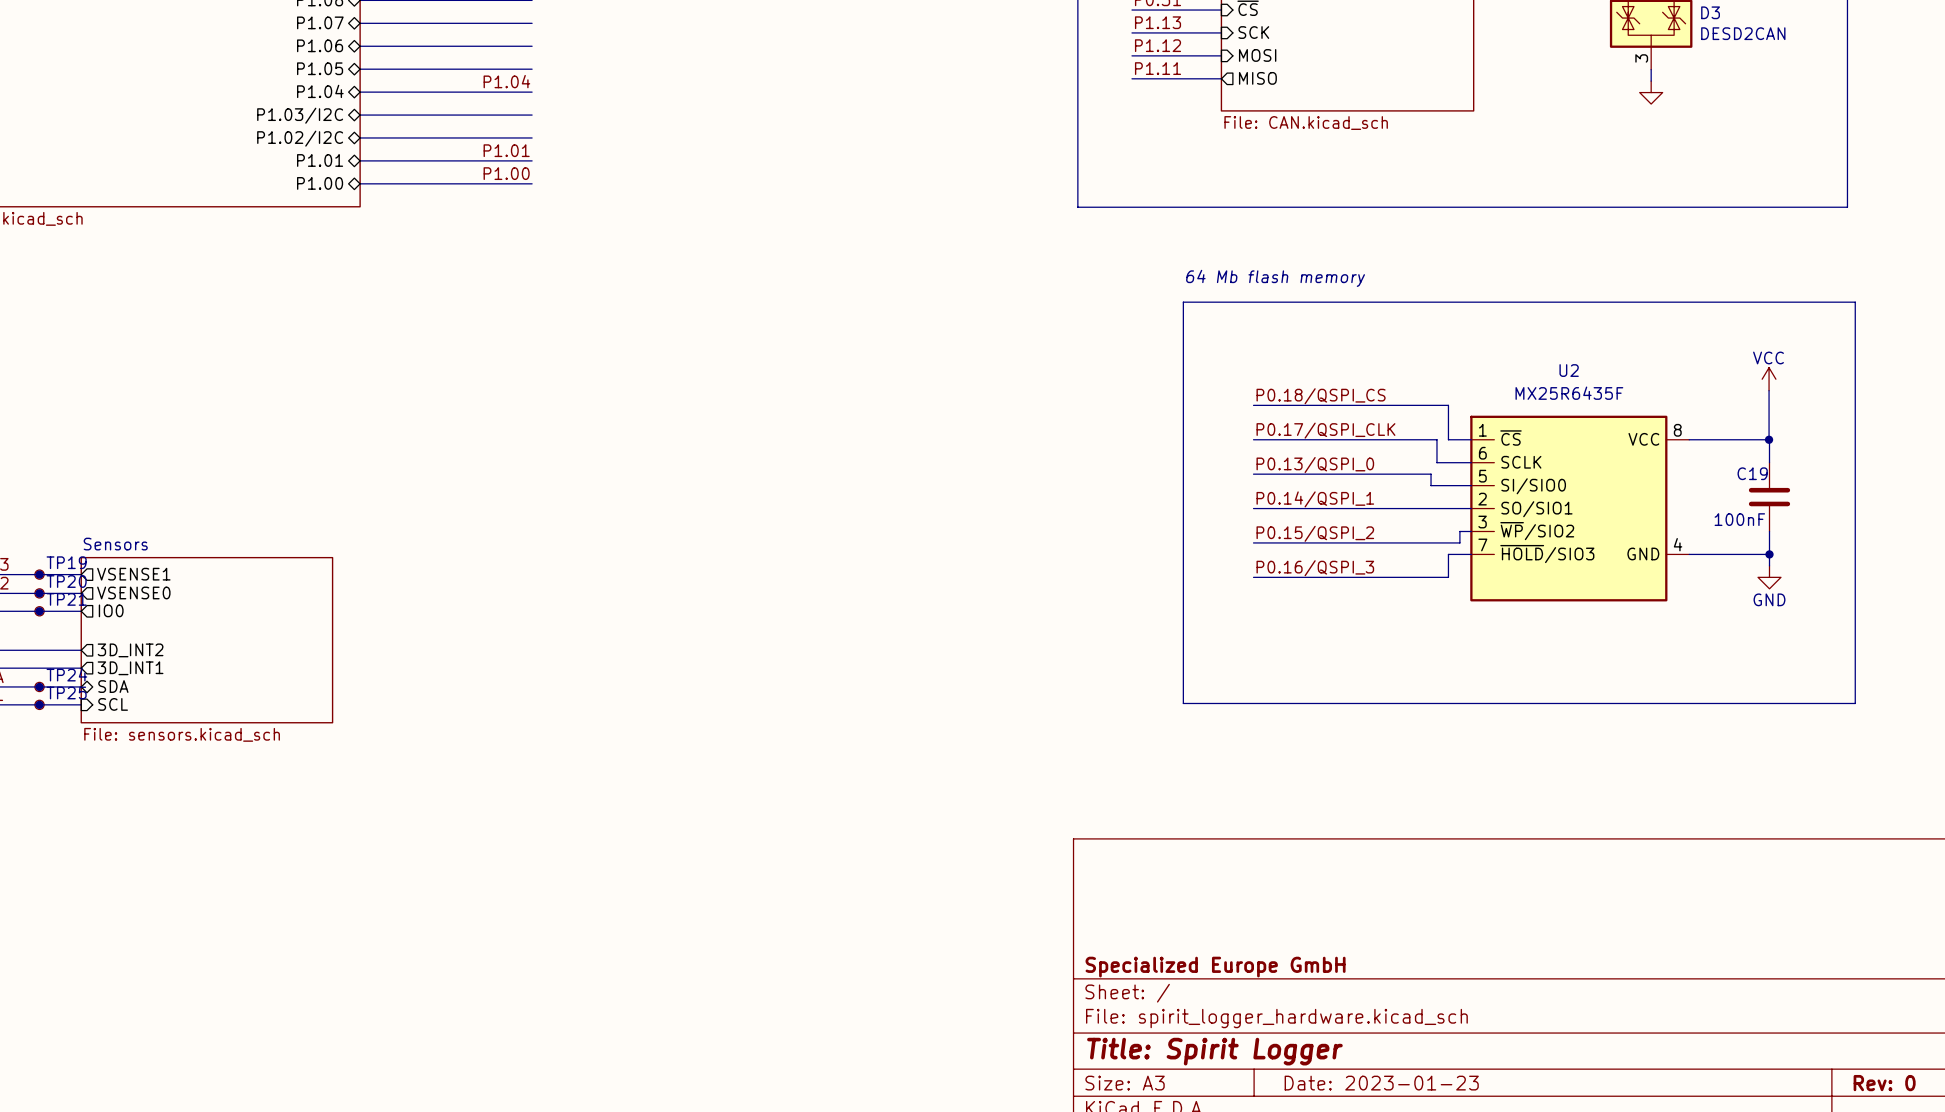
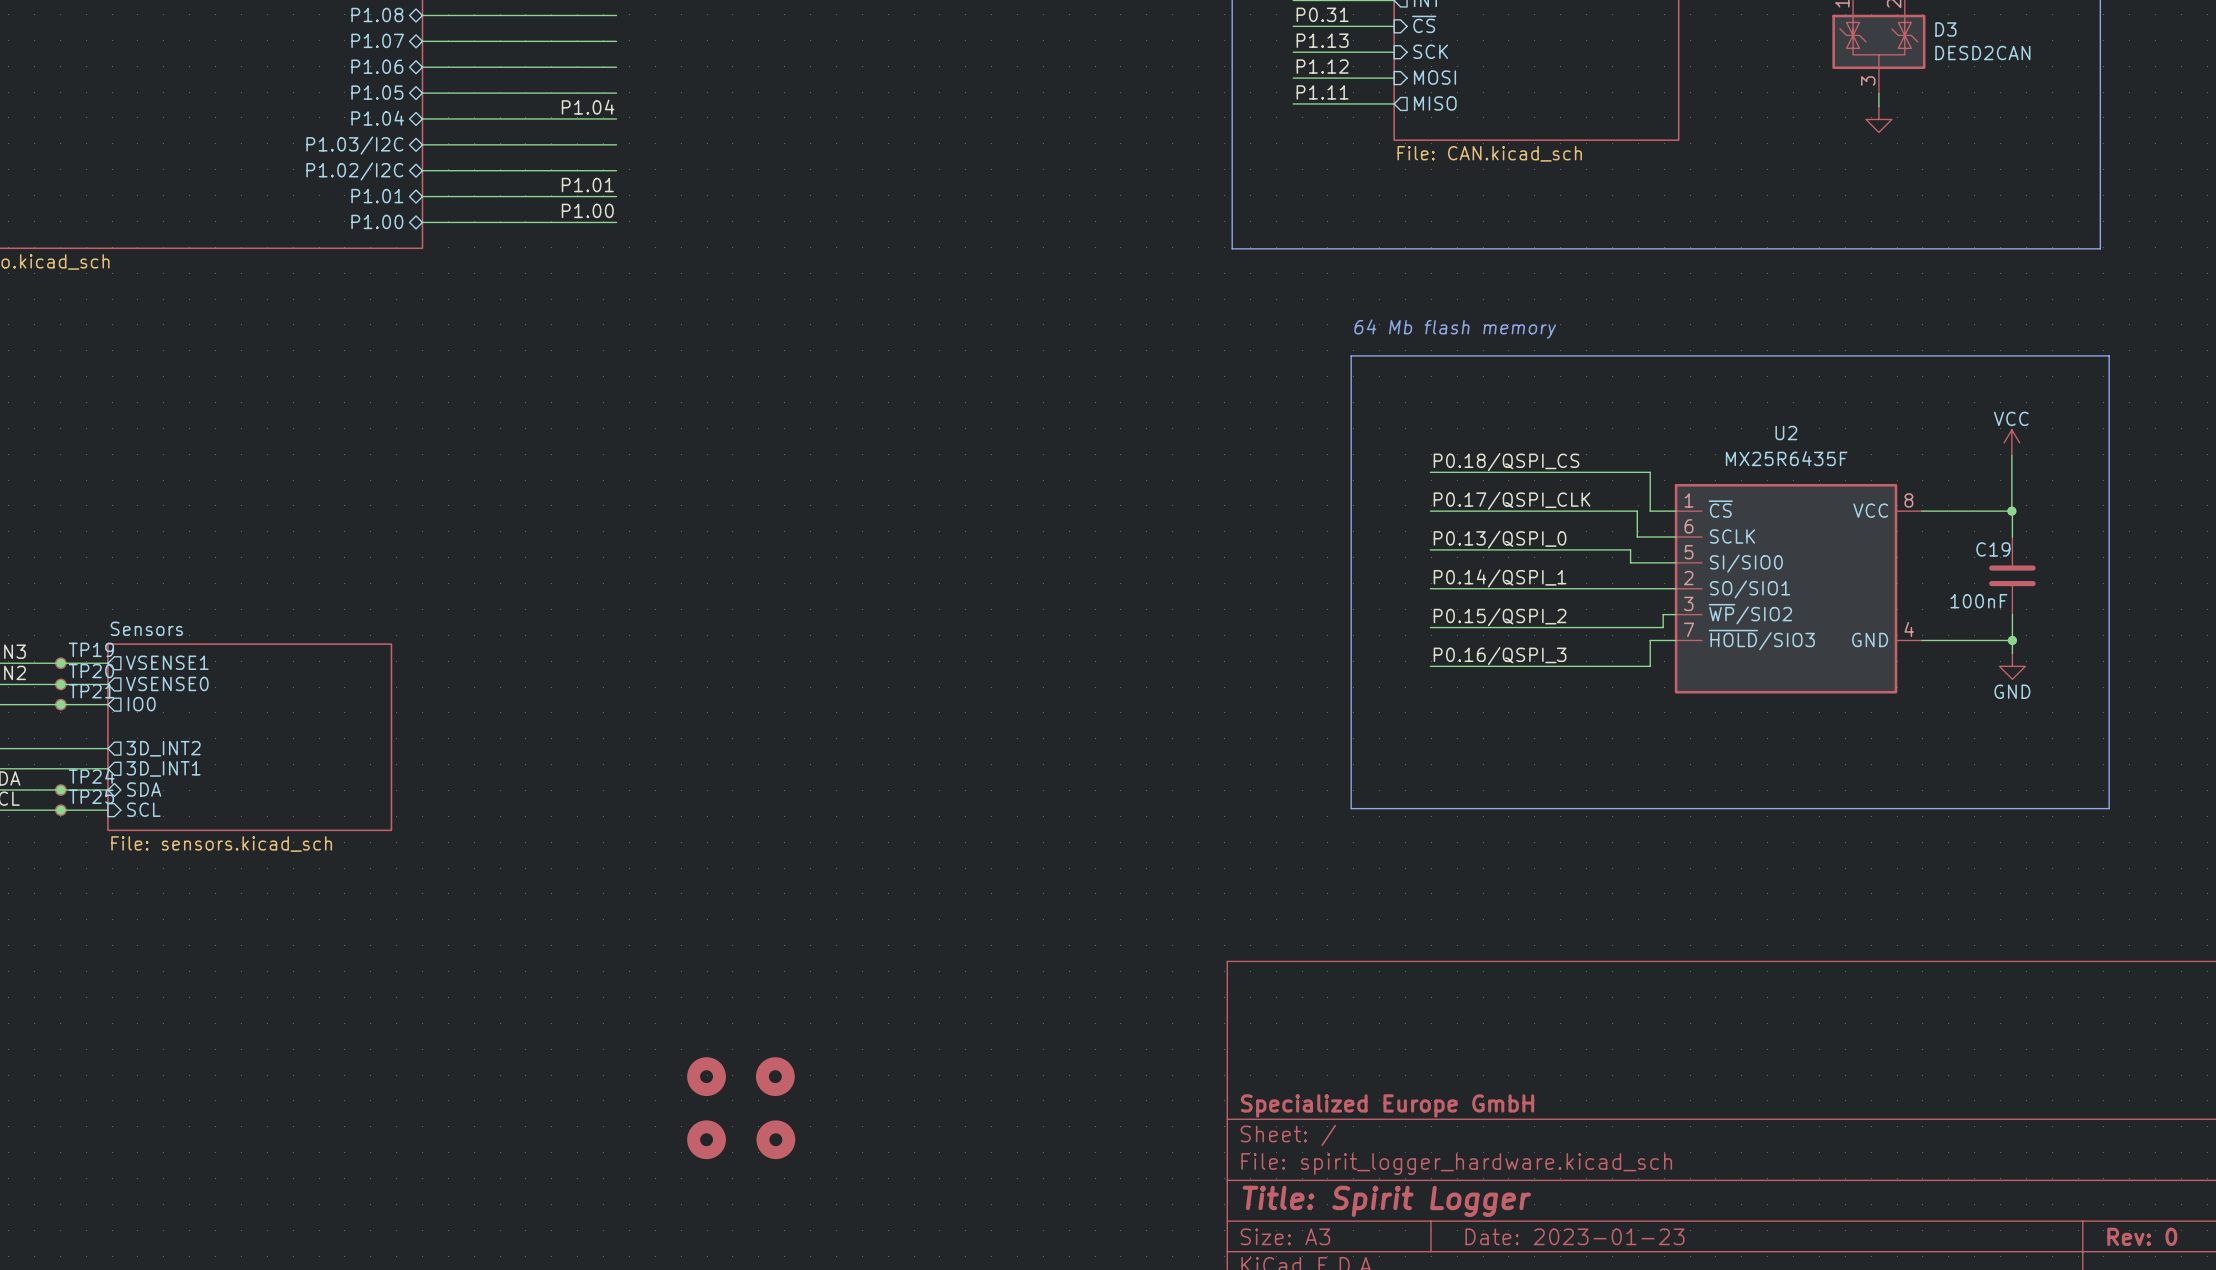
part: none -> (706, 1076)
part: none -> (775, 1076)
part: none -> (706, 1139)
part: none -> (775, 1139)

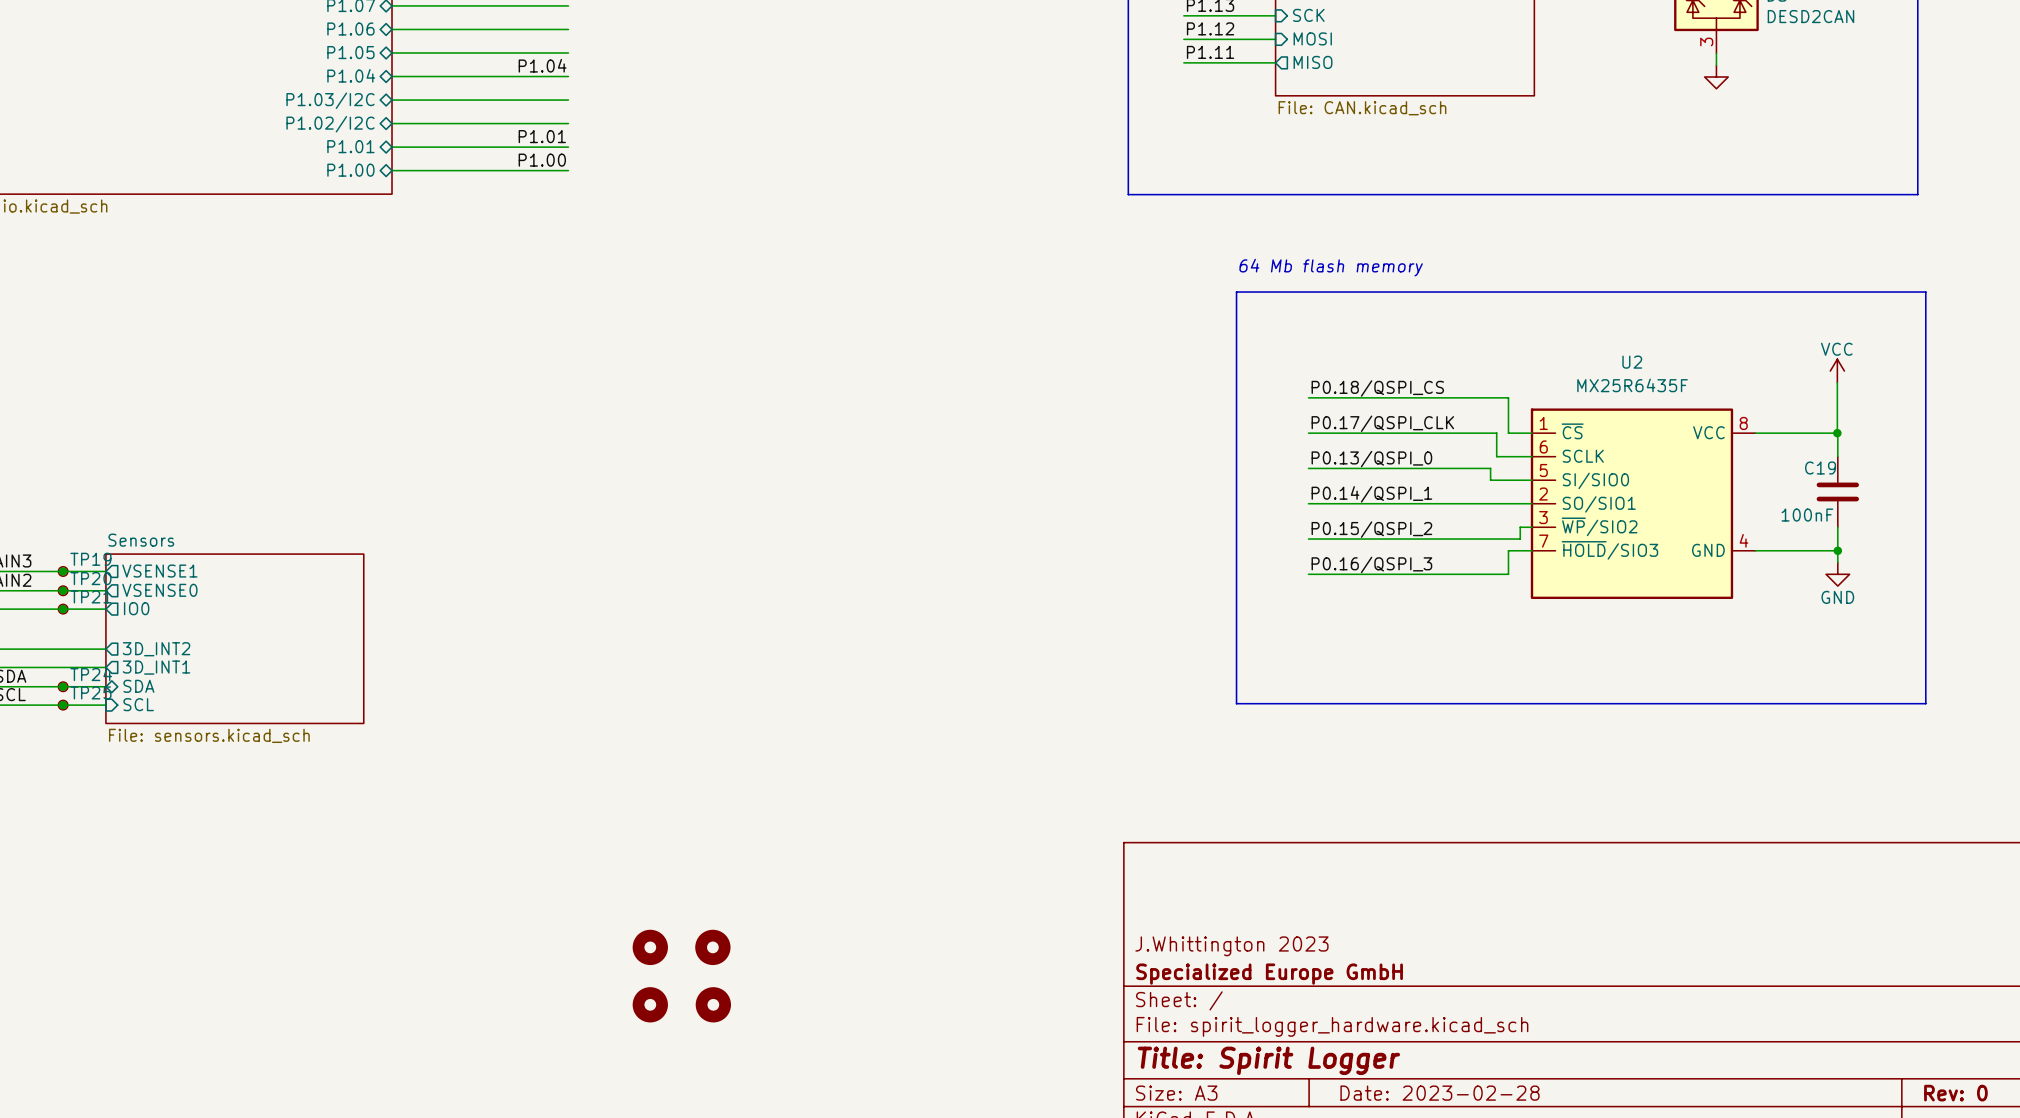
title block: none -> J.Whittington 2023 (1231, 946)
title block: Date: 2023-01-23 (1574, 1236) -> Date: 2023-02-28 (1440, 1093)

